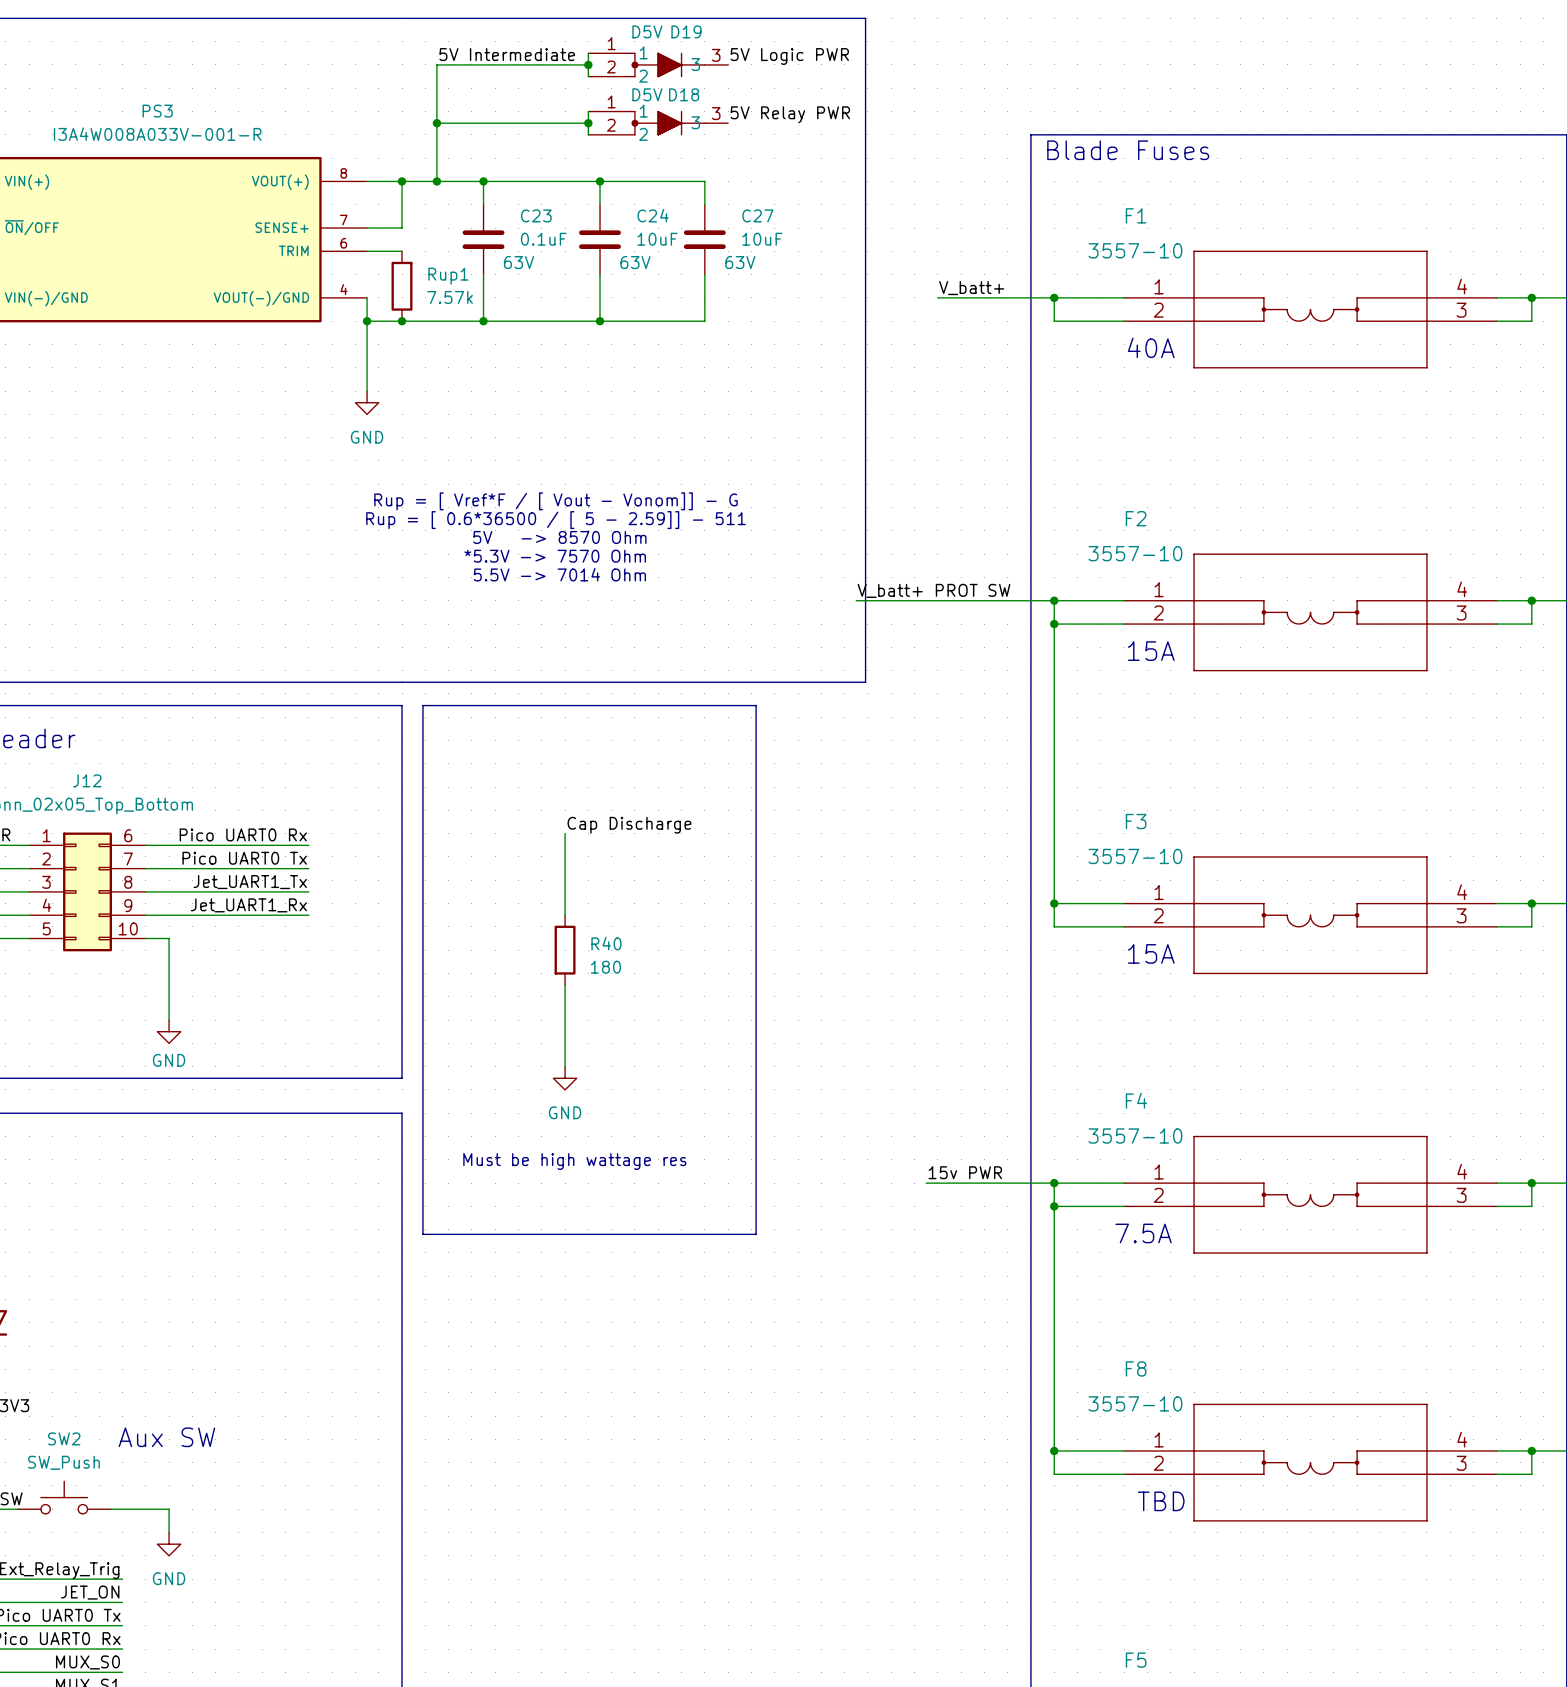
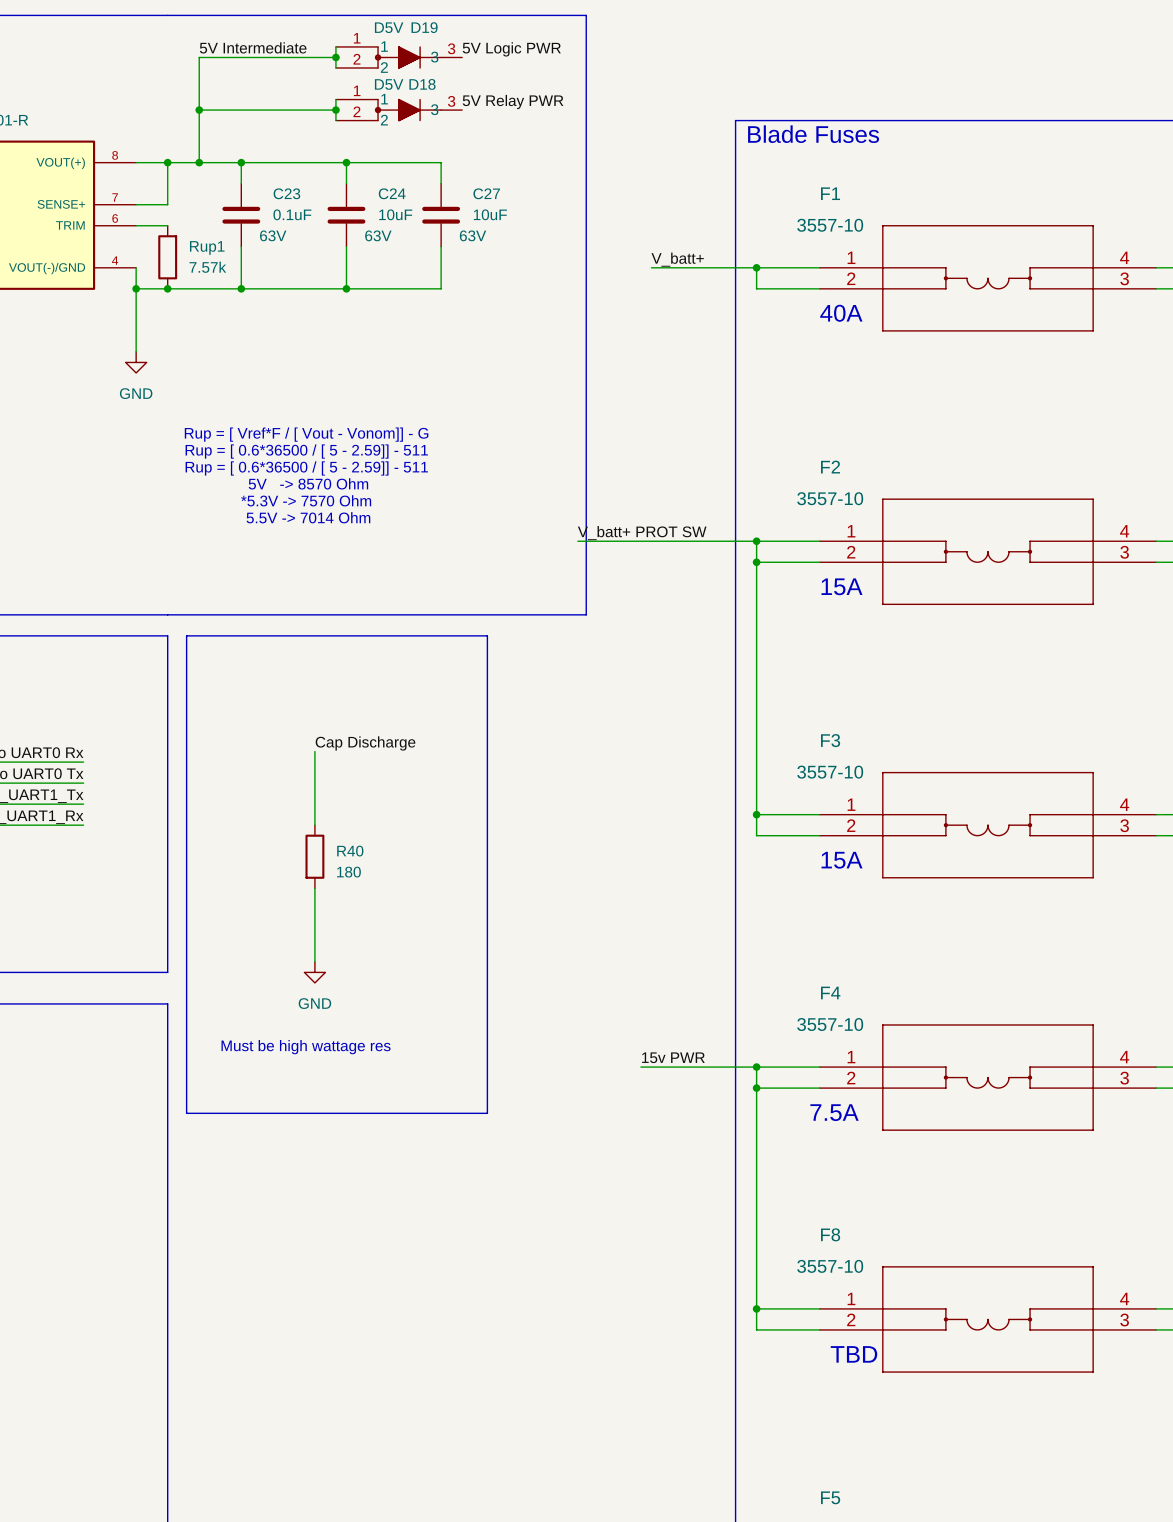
text: none -> Rup = [ Vref*F / [ Vout - Vonom]] - G (306, 434)
text: Rup = [ Vref*F / [ Vout - Vonom]] - G (556, 501) -> Rup = [ 0.6*36500 / [ 5 - 2.59]] - 511 (306, 451)

